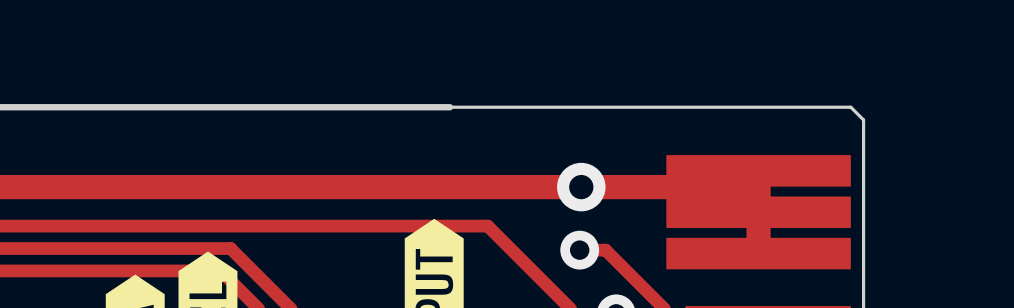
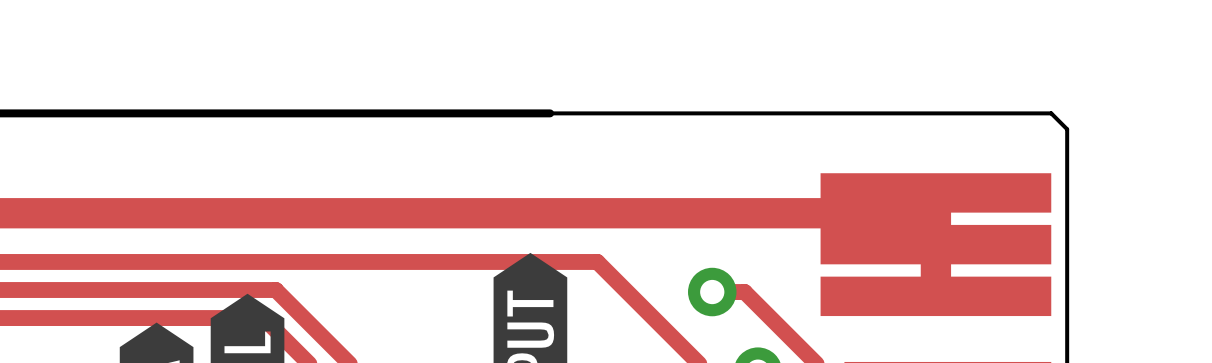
via: (581, 187) -> none

